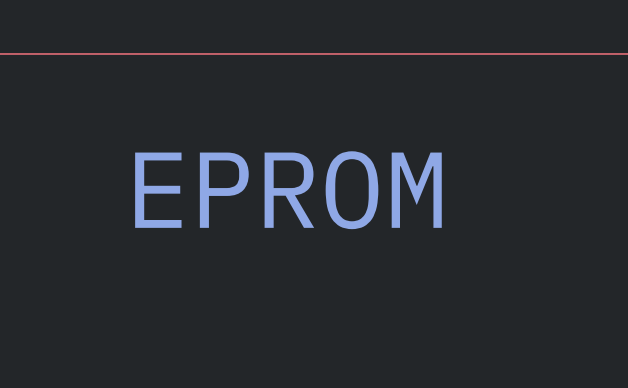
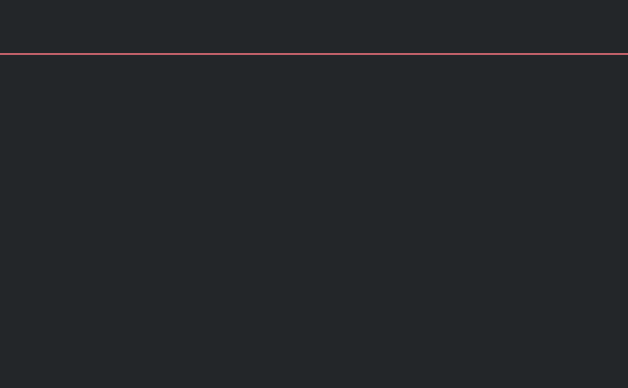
text: EPROM (288, 190) -> none

